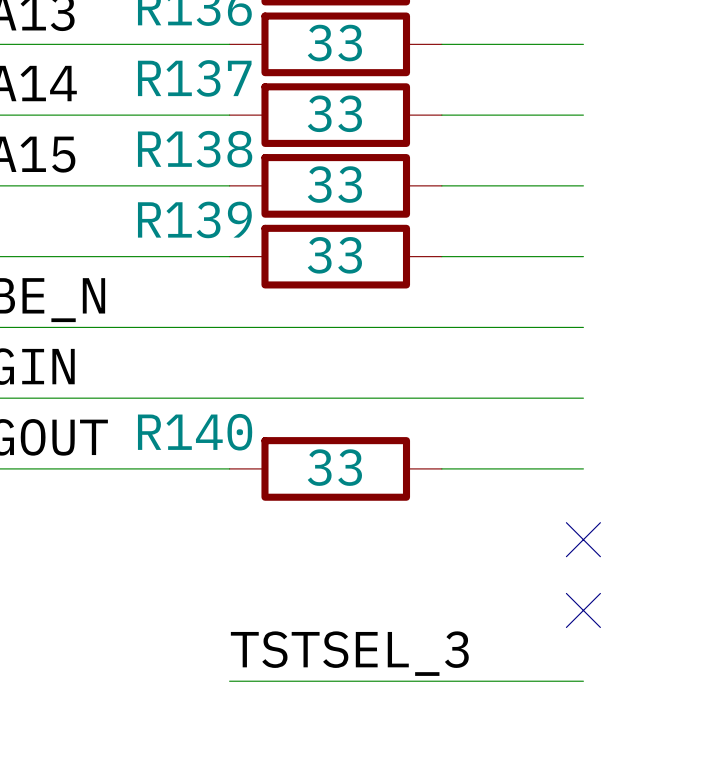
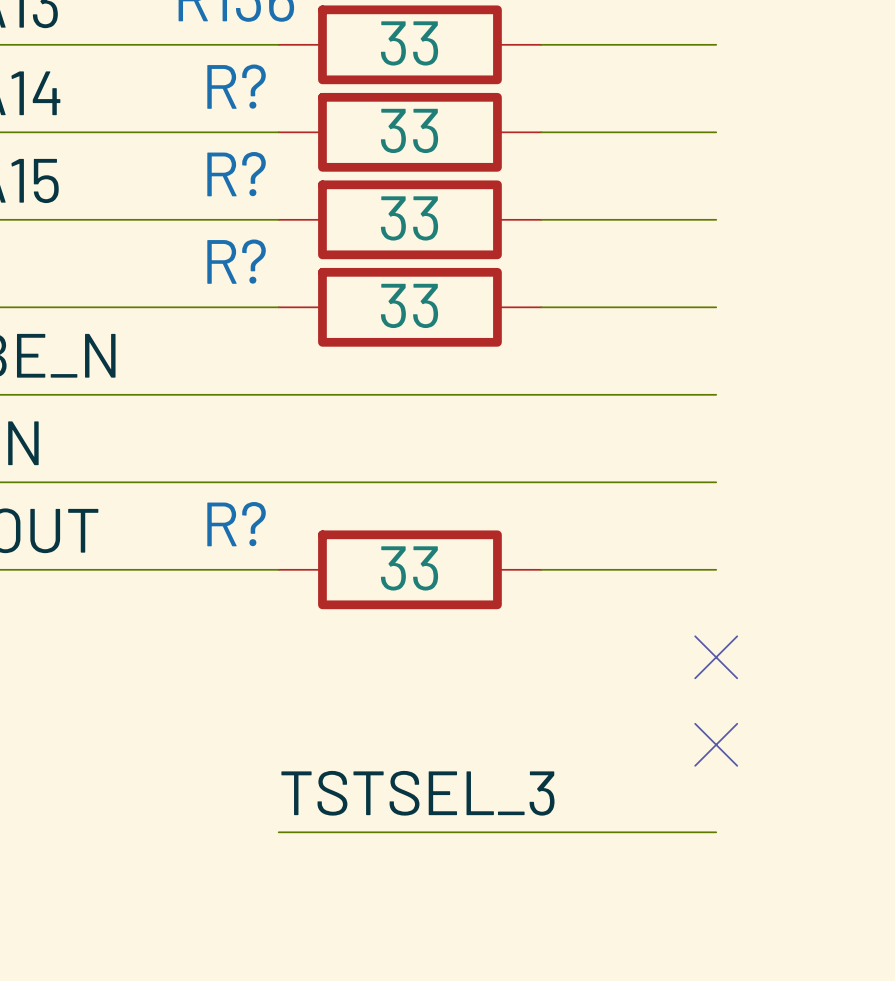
R137 name: R137 (194, 78) -> R? (236, 86)
R138 name: R138 (195, 149) -> R? (236, 174)
R139 name: R139 (194, 219) -> R? (236, 261)
R140 name: R140 (195, 432) -> R? (236, 524)

